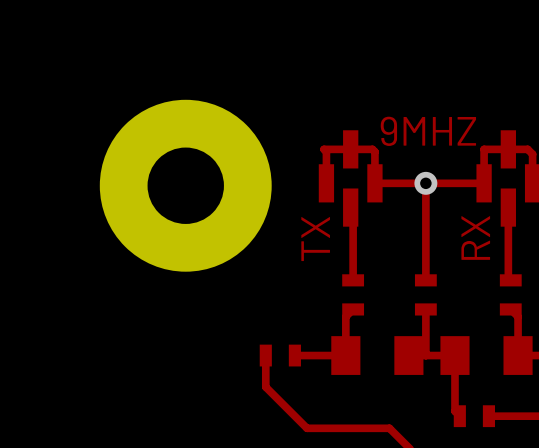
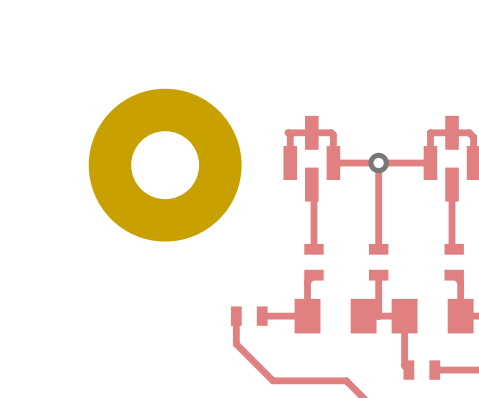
text: 9MHZ (428, 131) -> none
text: RX (475, 237) -> none
text: TX (315, 239) -> none

